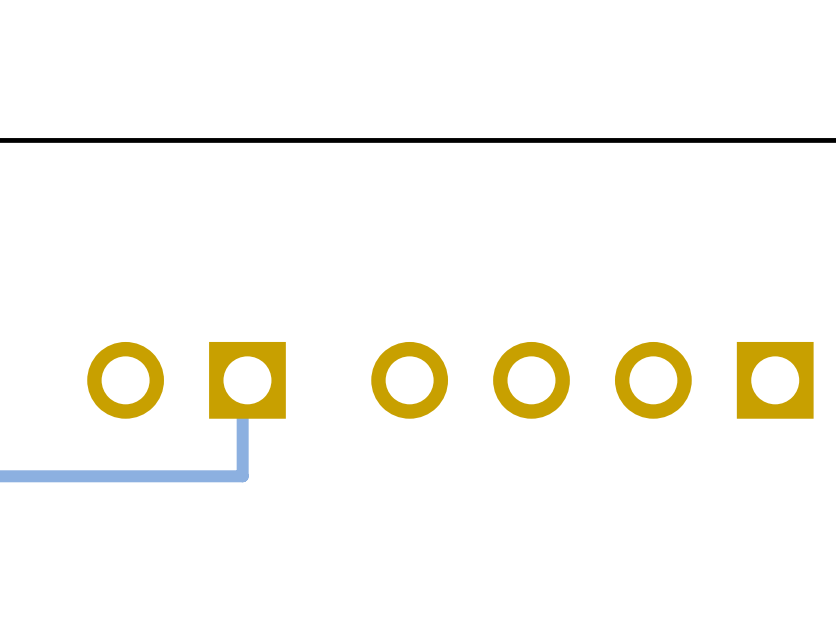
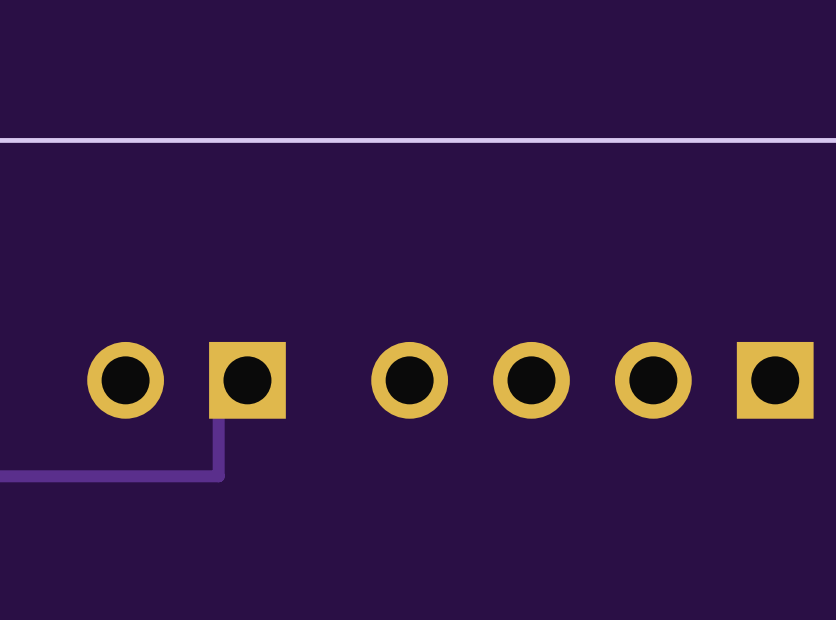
track: (242, 385) (242, 476) (218, 476) -> (218, 409) (218, 476)

